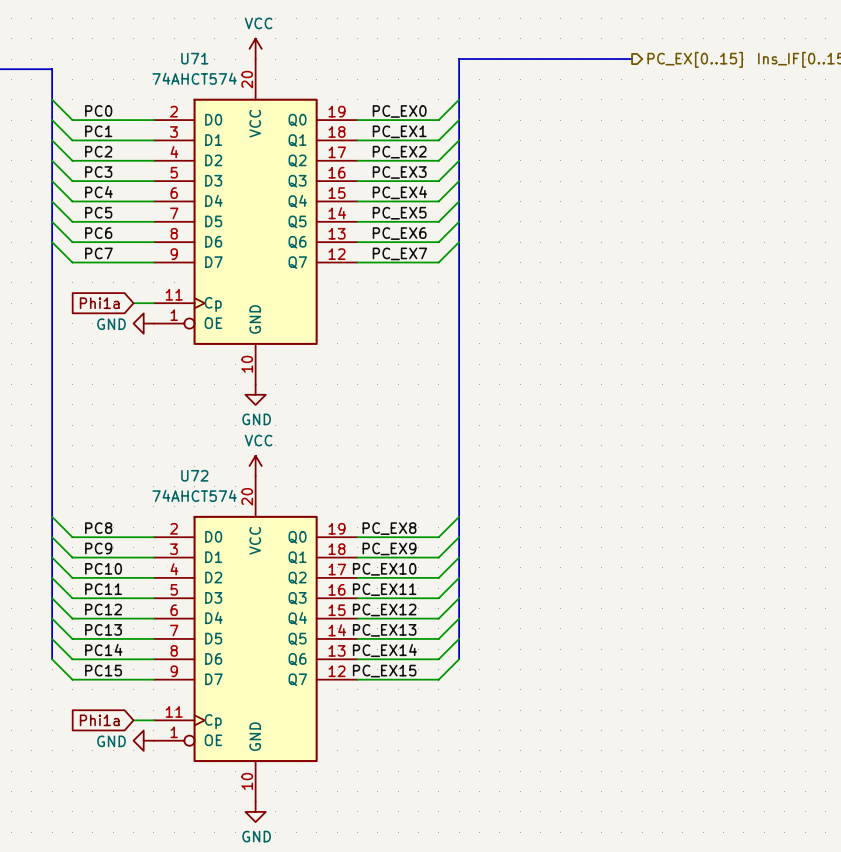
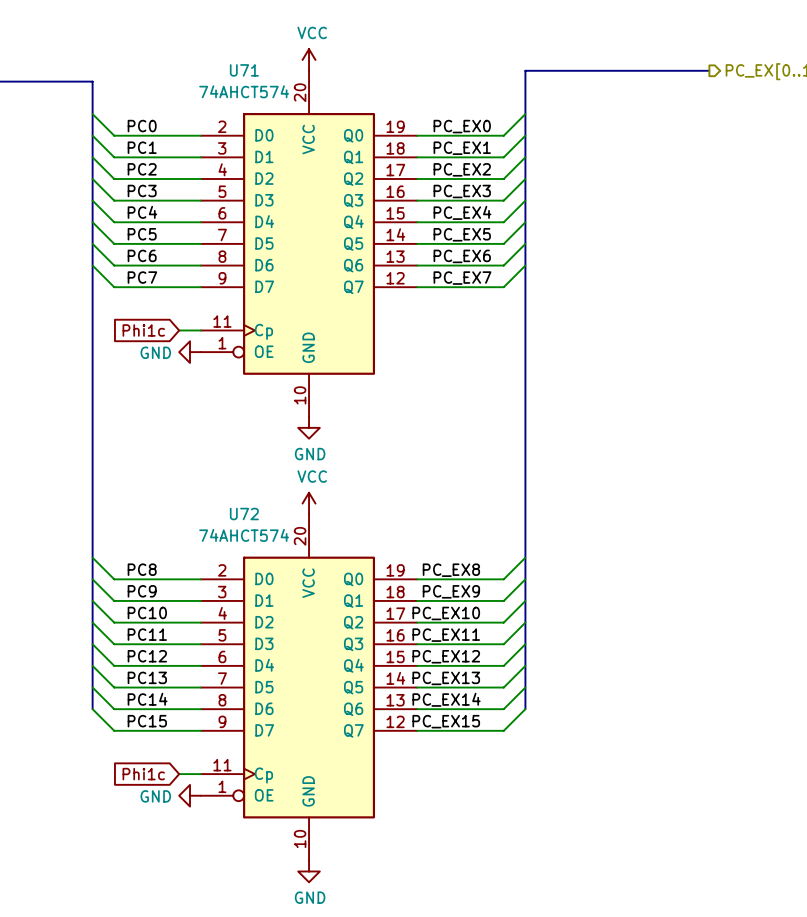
global label: Phi1a (99, 303) -> Phi1c (143, 330)
global label: Phi1a (99, 720) -> Phi1c (143, 774)

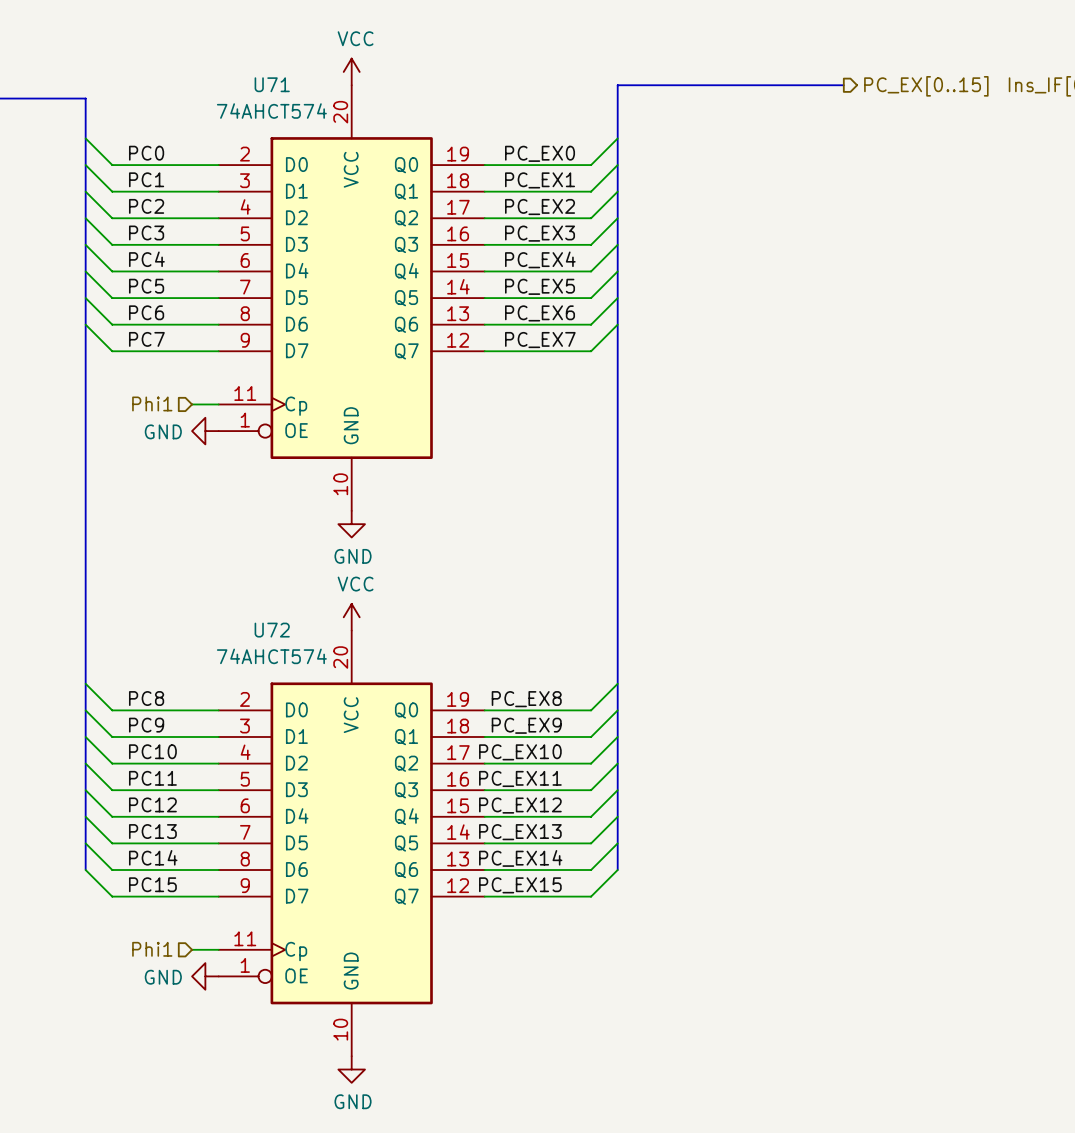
global label: Phi1c (143, 330) -> none
hierarchical label: none -> Phi1 (152, 403)
hierarchical label: none -> Phi1 (152, 949)
global label: Phi1c (143, 774) -> none

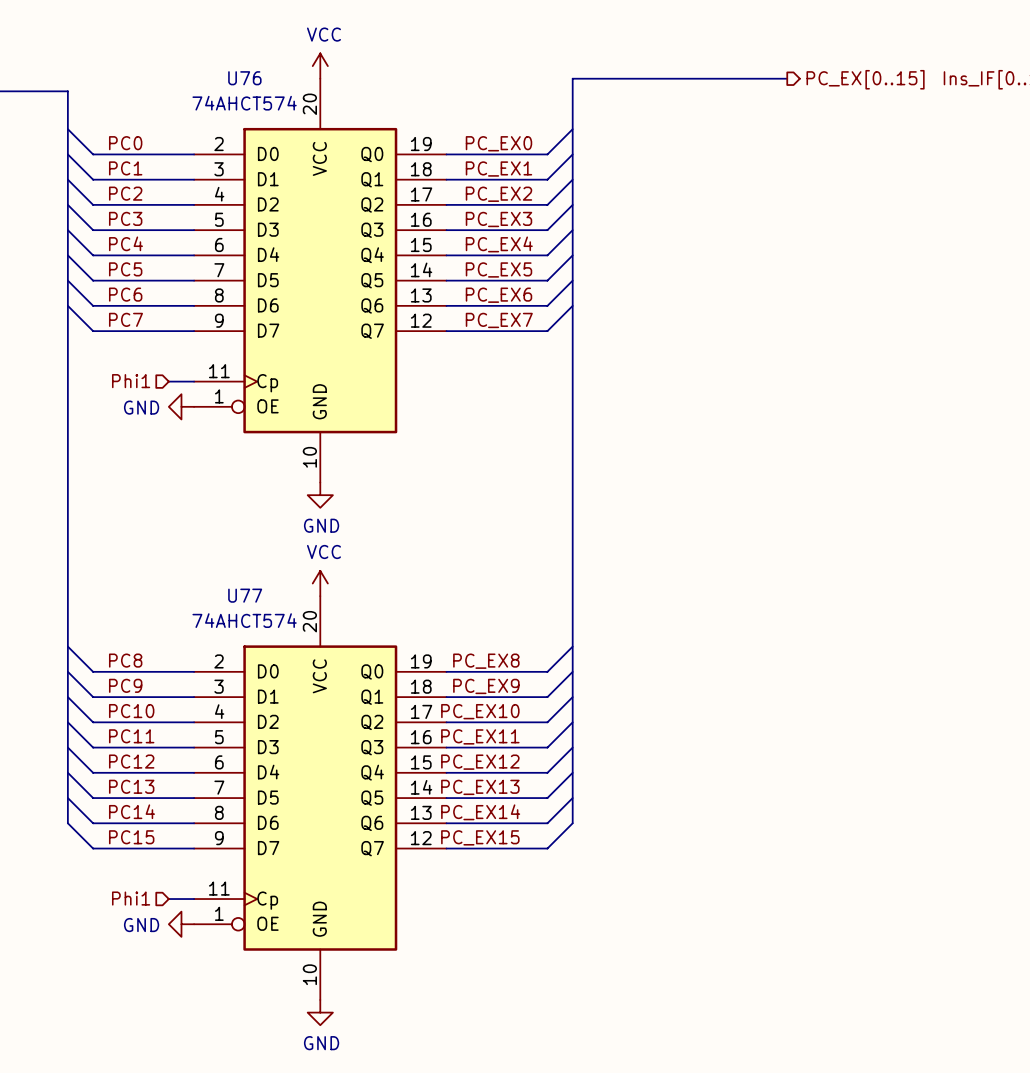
U71 name: U71 (272, 84) -> U76 (244, 78)
U72 name: U72 (272, 630) -> U77 (245, 595)

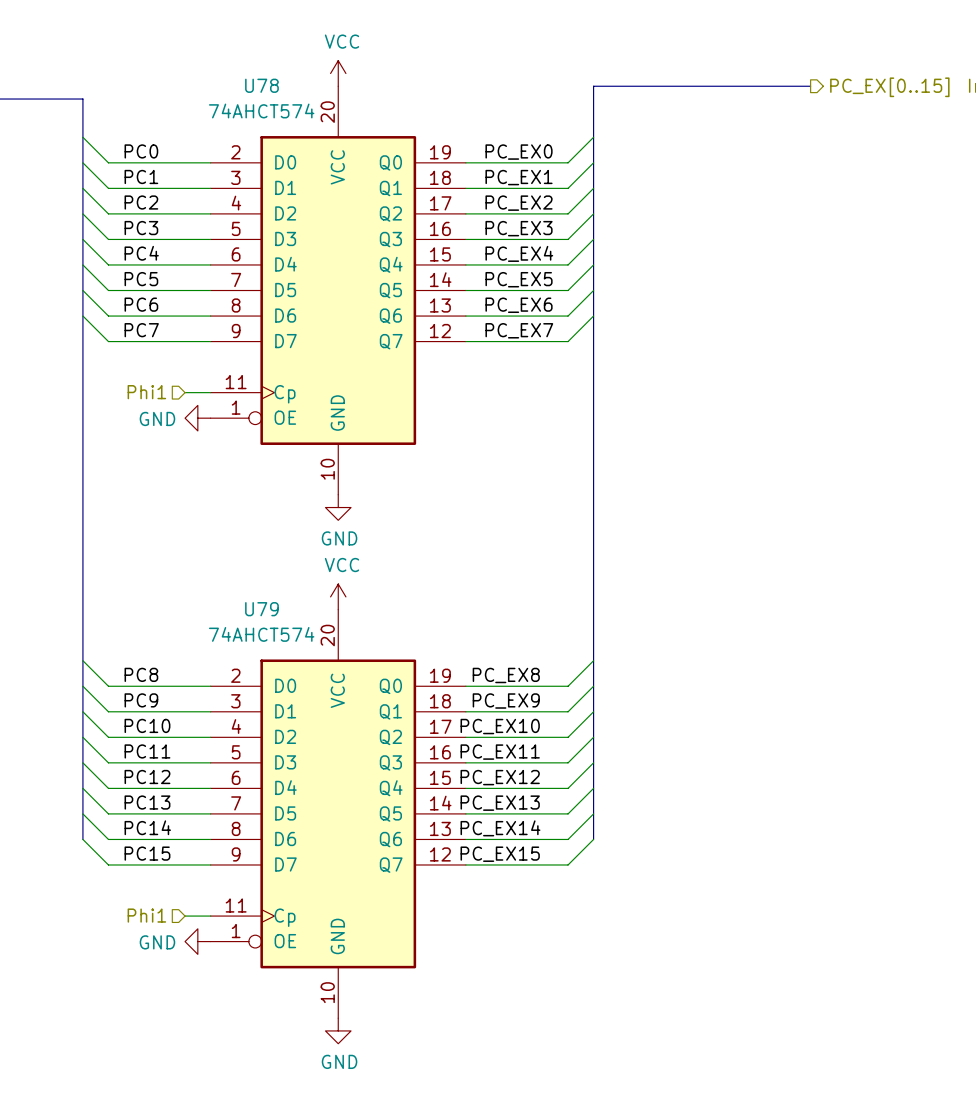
U76 name: U76 (244, 78) -> U78 (261, 85)
U77 name: U77 (245, 595) -> U79 (261, 609)

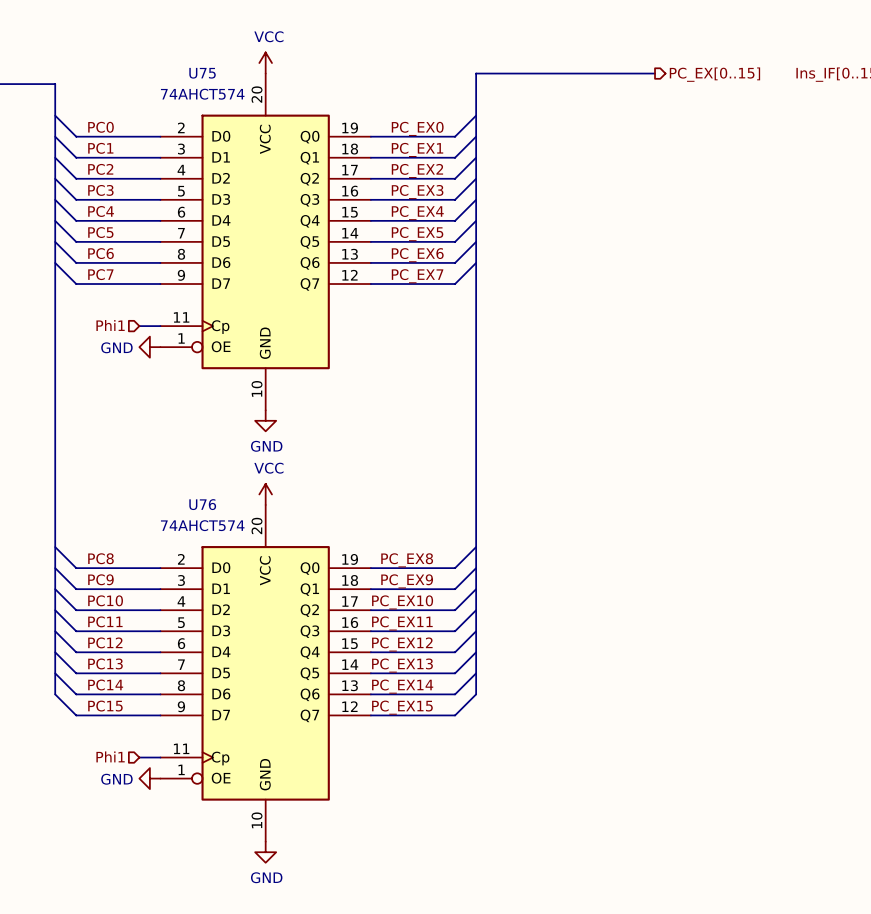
U78 name: U78 (261, 85) -> U75 (202, 73)
U79 name: U79 (261, 609) -> U76 (202, 504)

